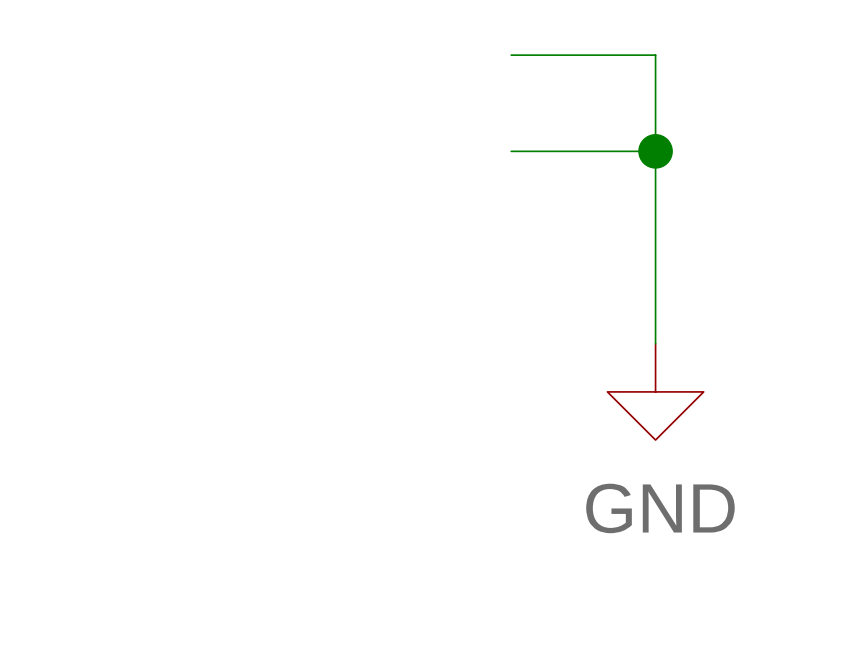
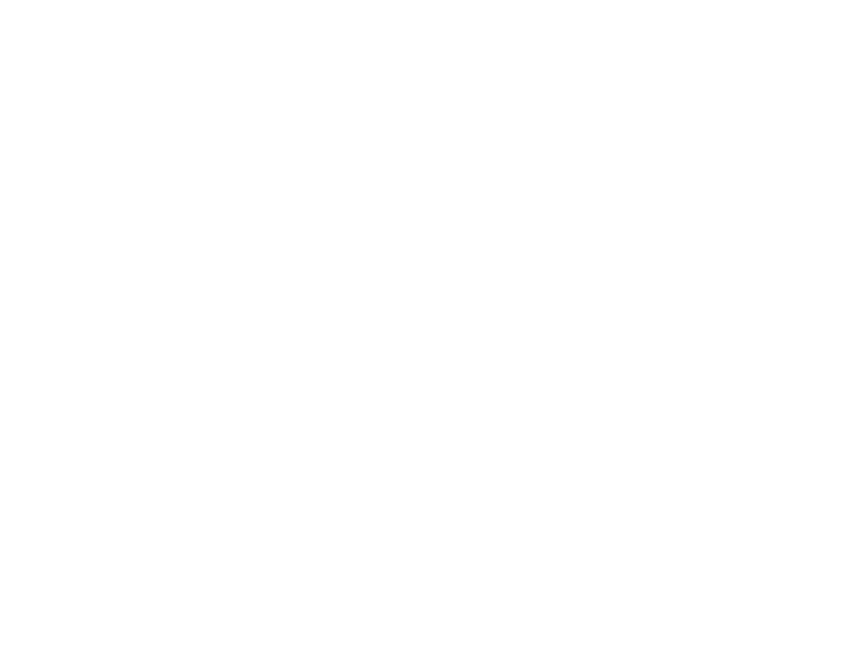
wire: (511, 55) (655, 55) (655, 343) -> none
wire: (511, 151) (655, 151) -> none
junction: (655, 151) -> none
power symbol: GND (655, 391) -> none

